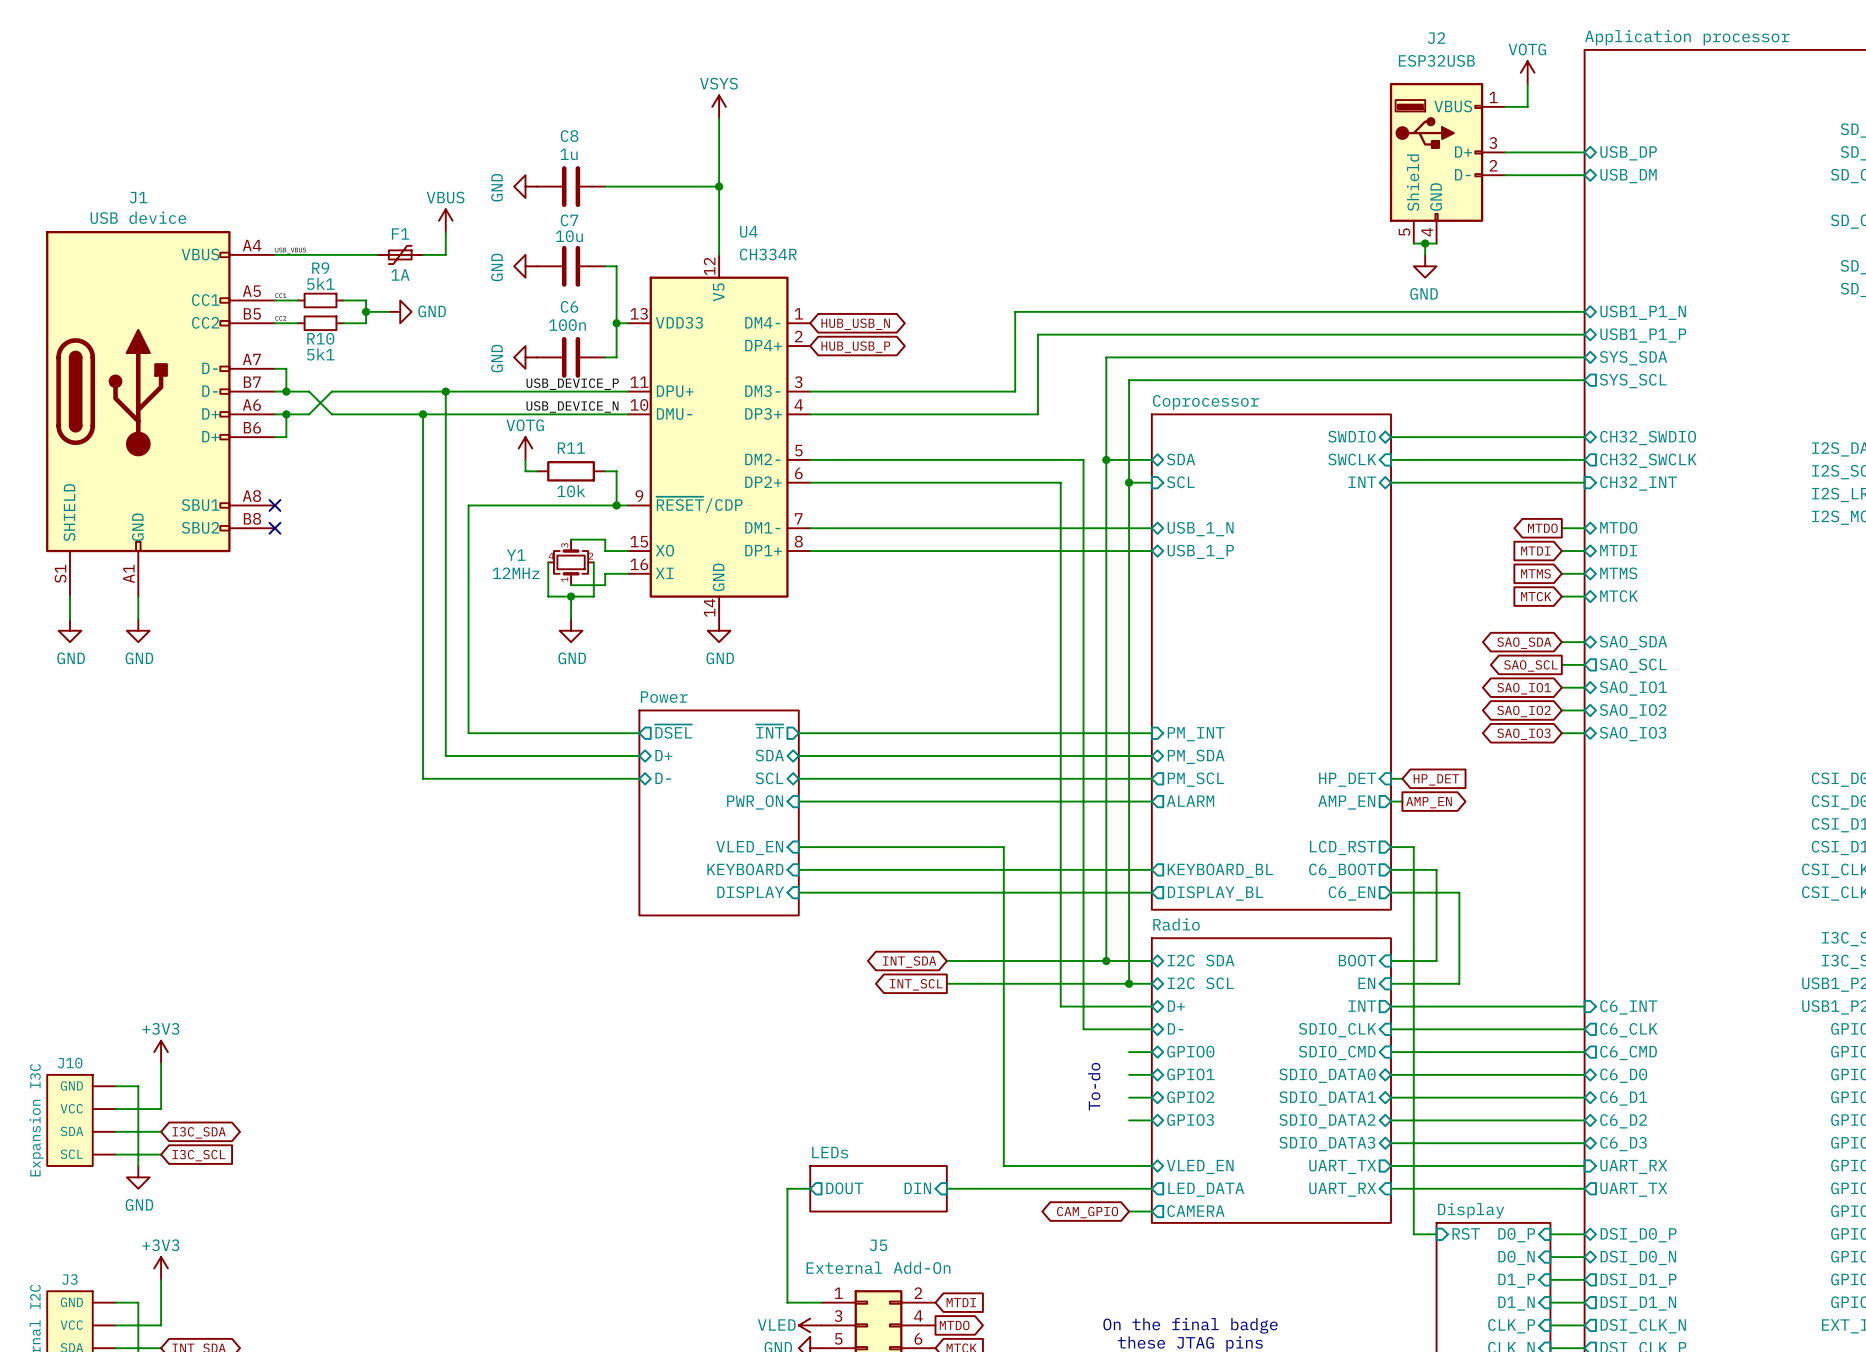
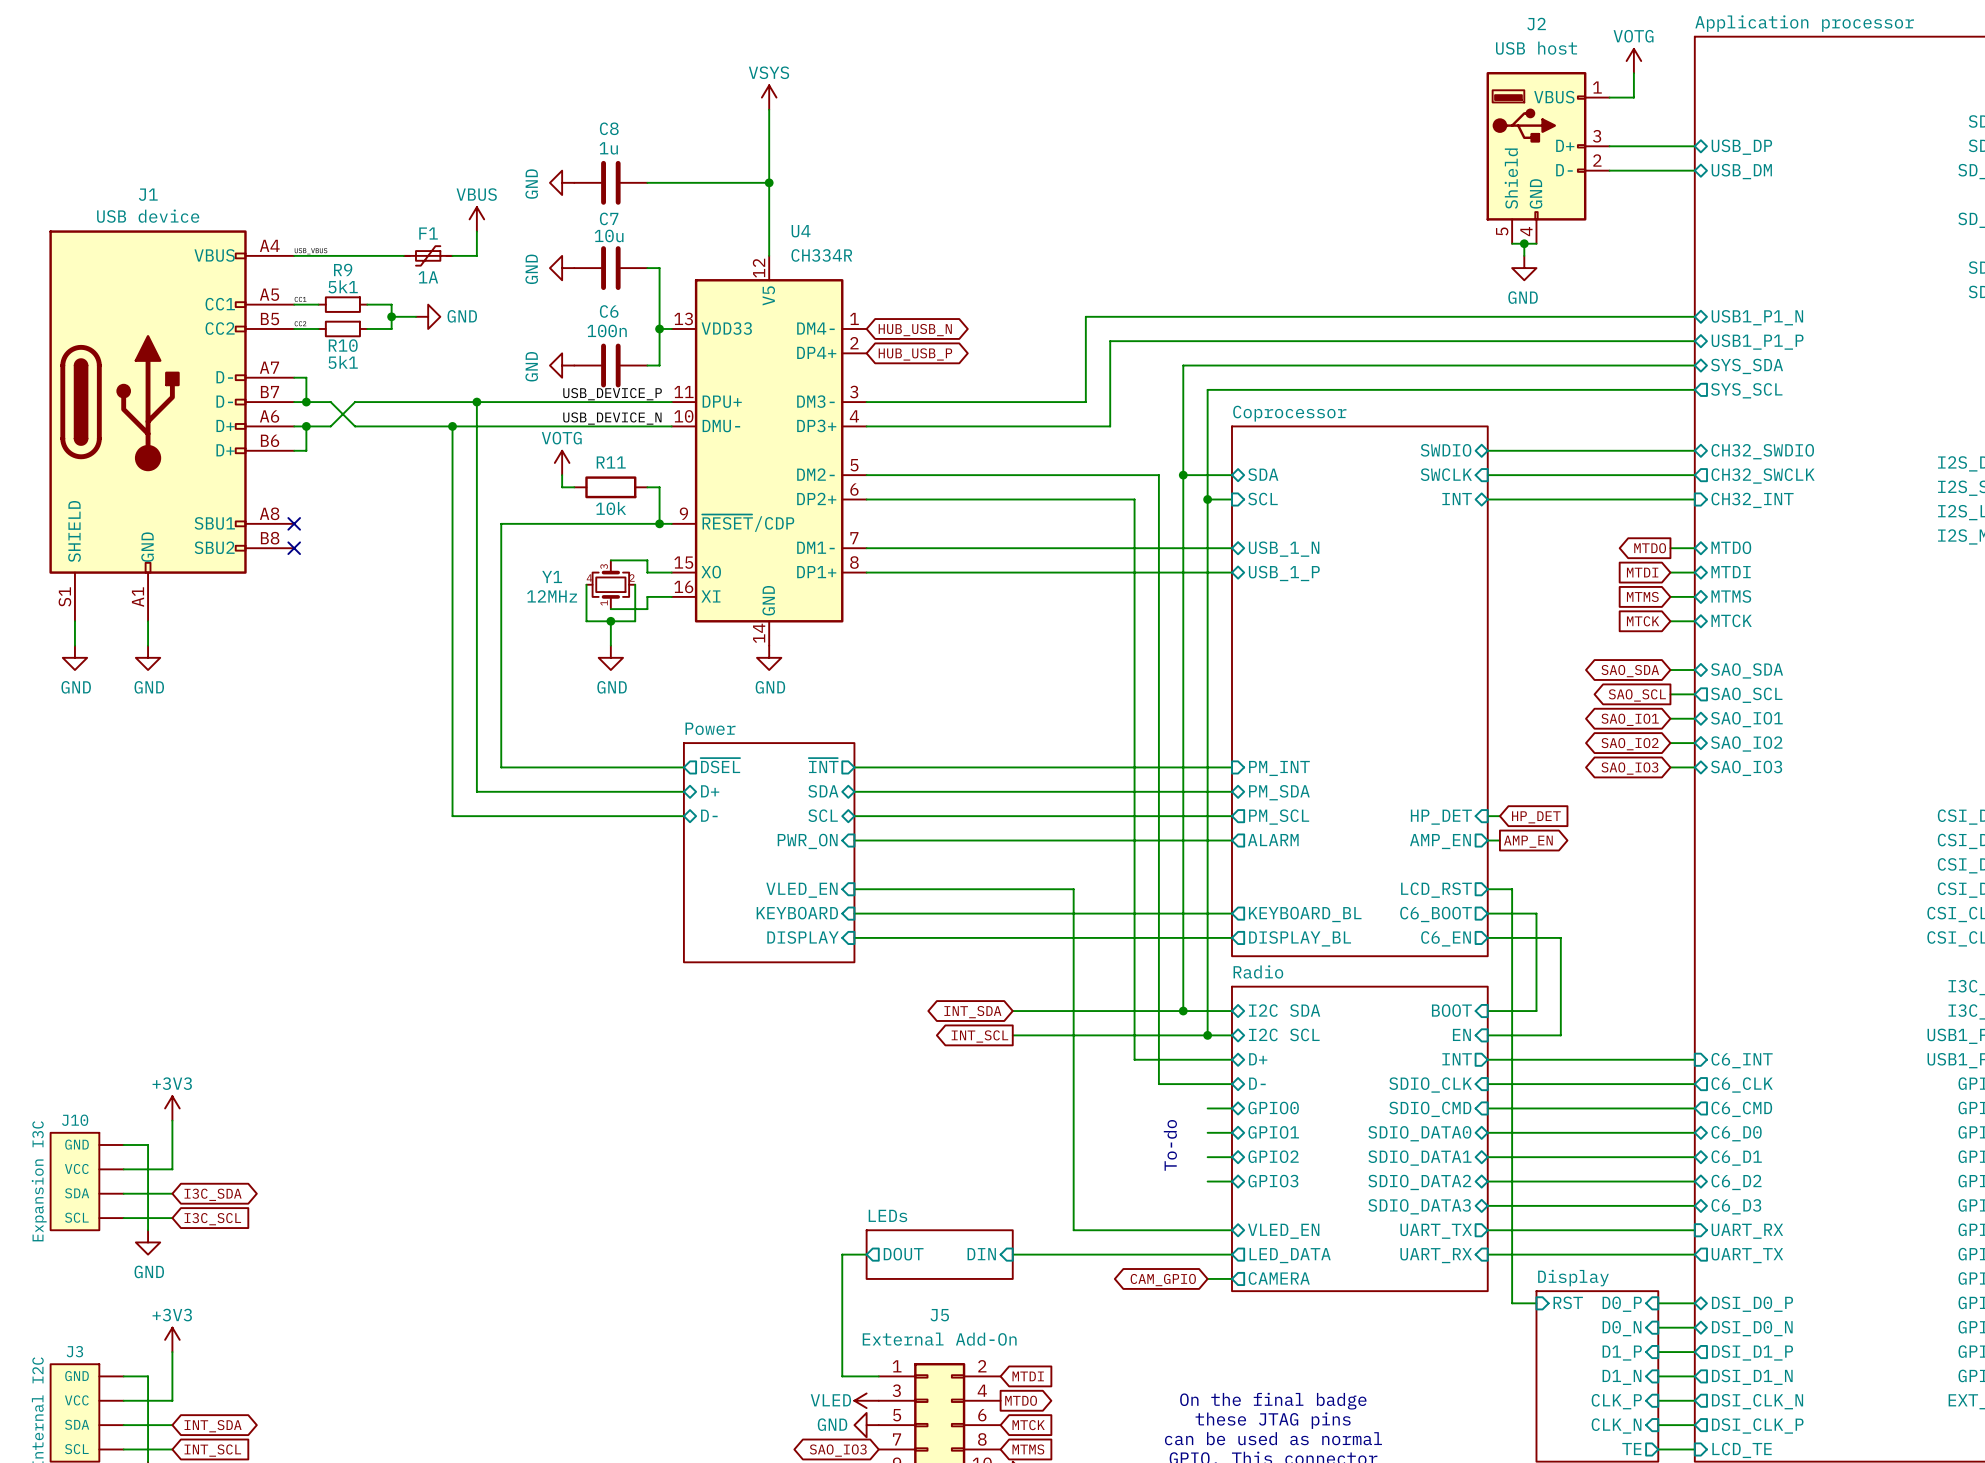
J2 value: ESP32USB (1436, 60) -> USB host (1536, 48)

